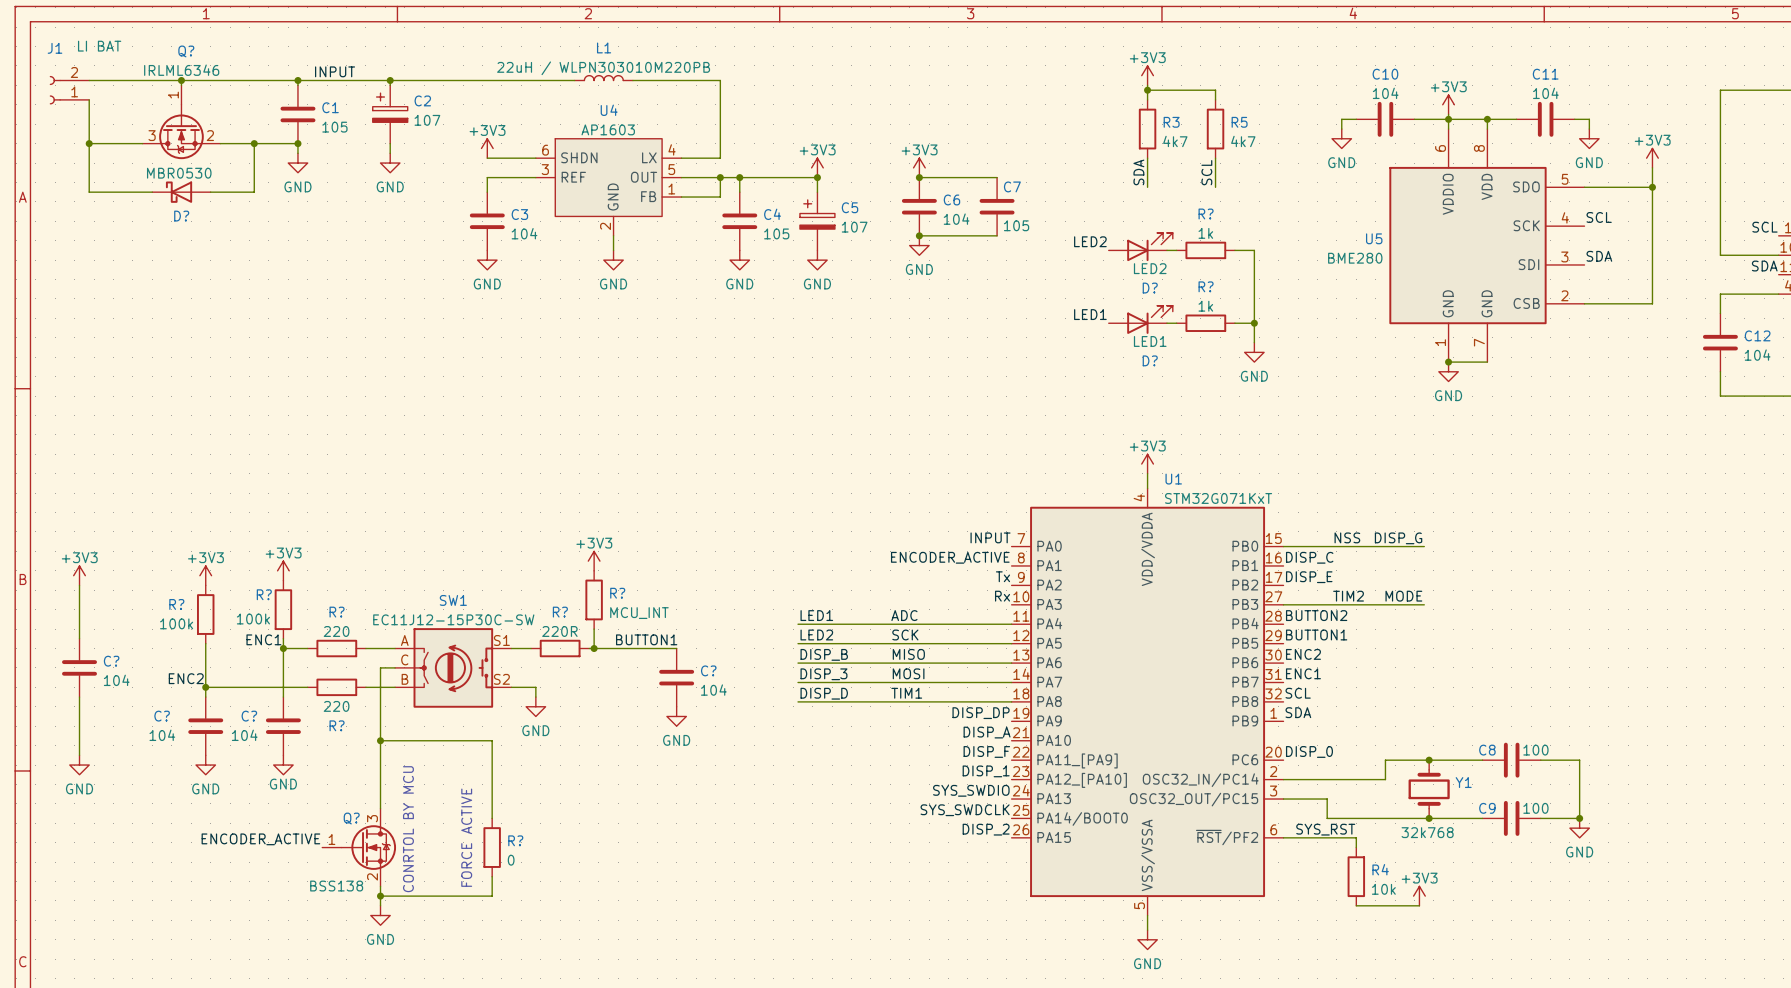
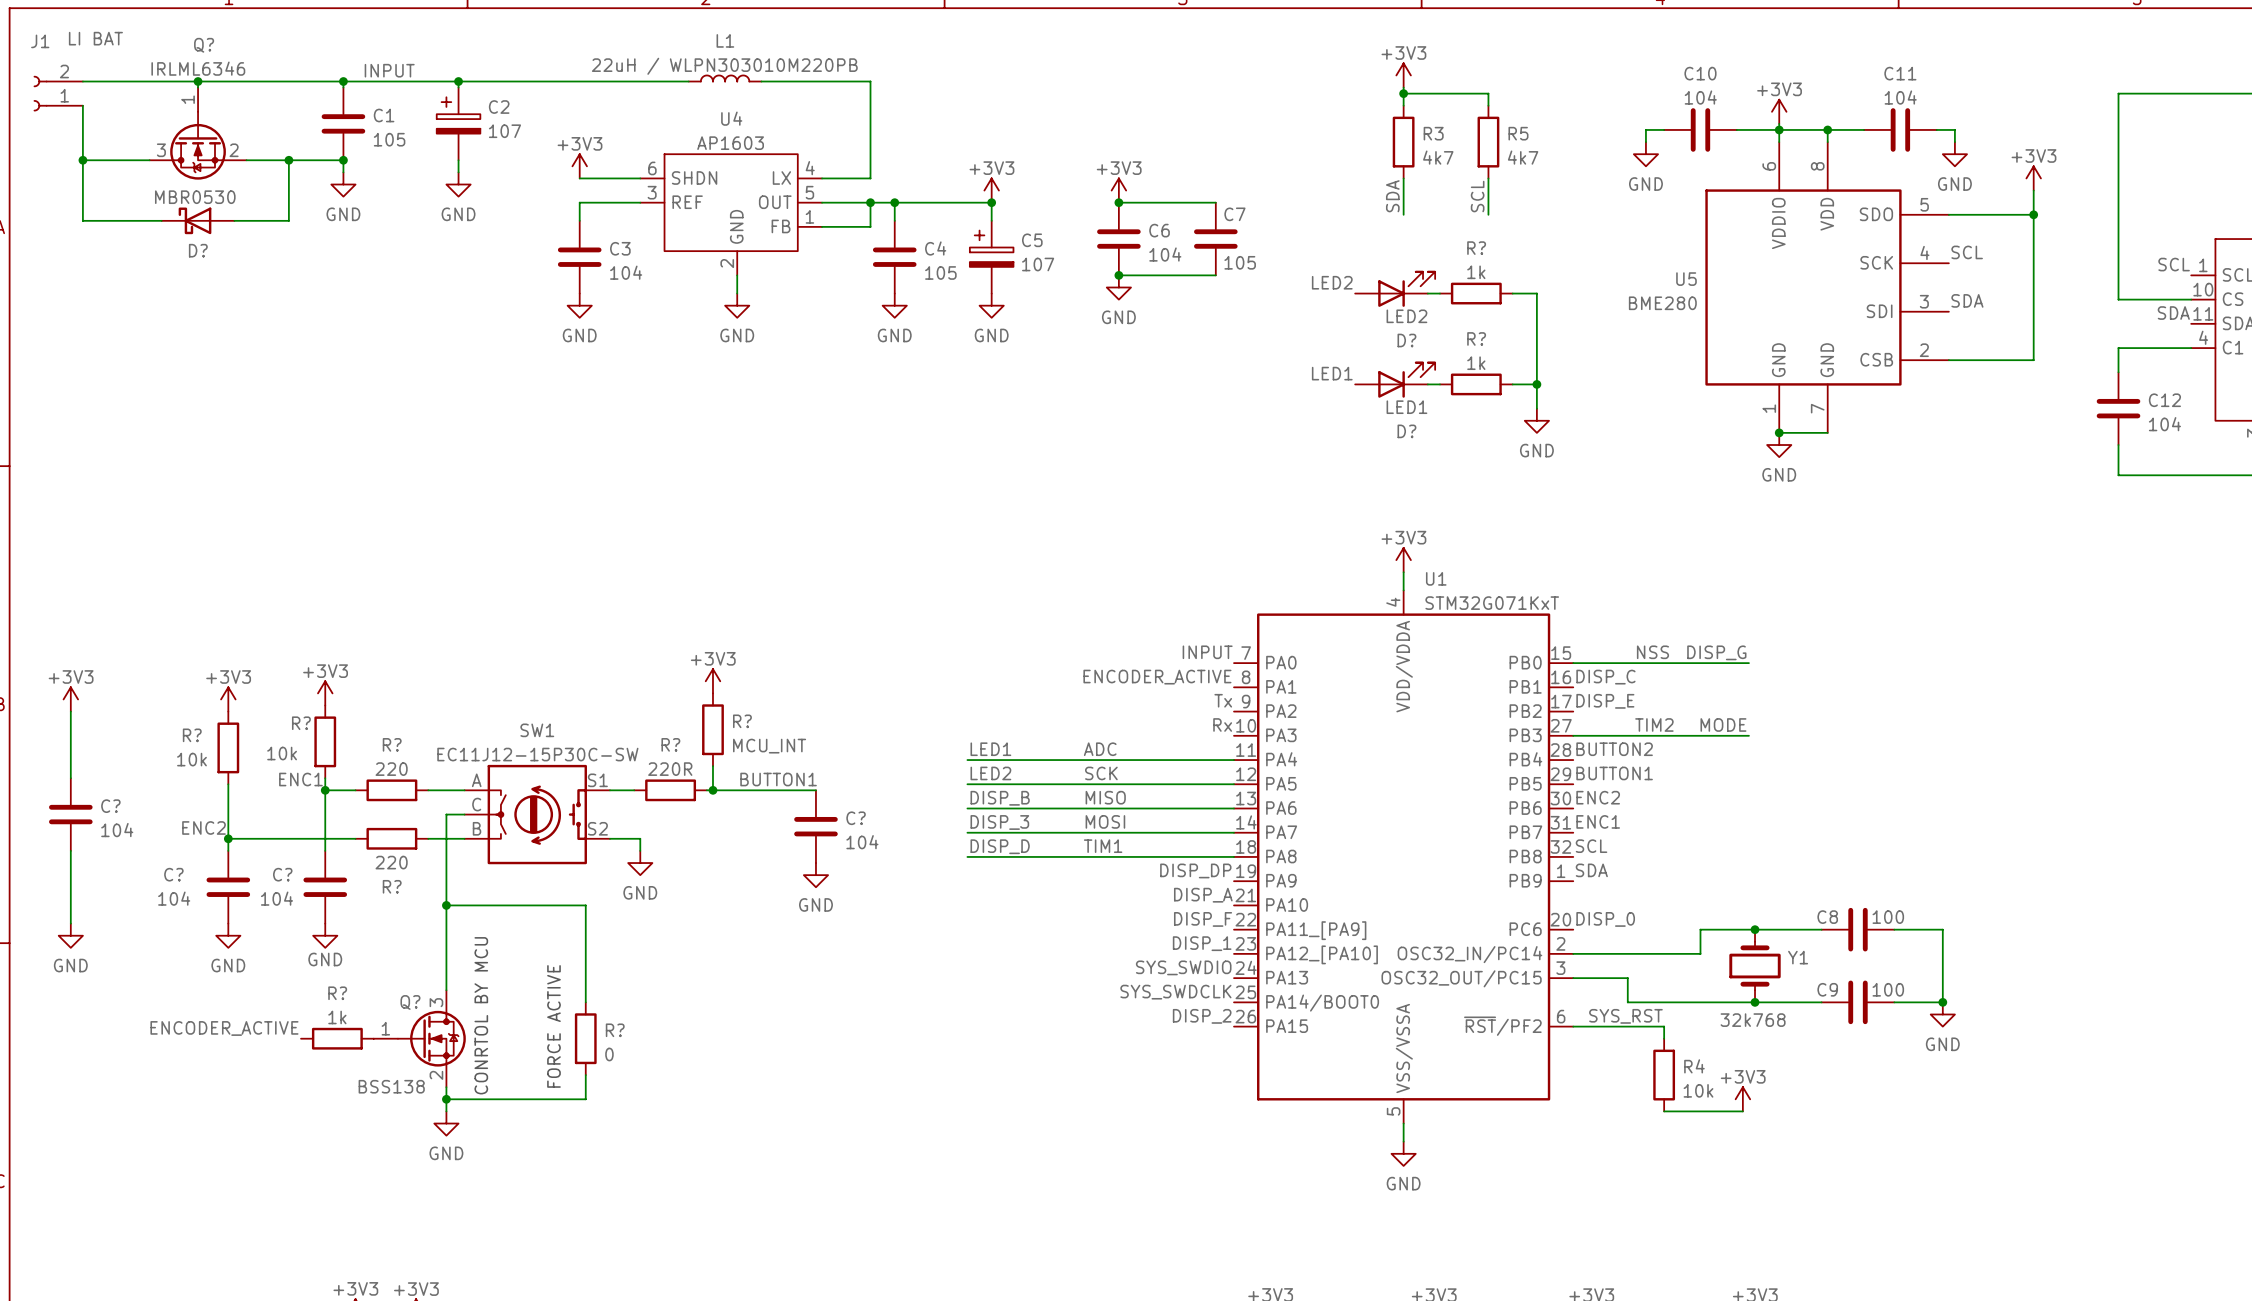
R? value: 100k (253, 619) -> 10k (282, 753)
R? value: 100k (176, 623) -> 10k (191, 759)
label position: ENCODER_ACTIVE (260, 839) -> ENCODER_ACTIVE (224, 1028)
R?: none -> 1k (337, 1038)

